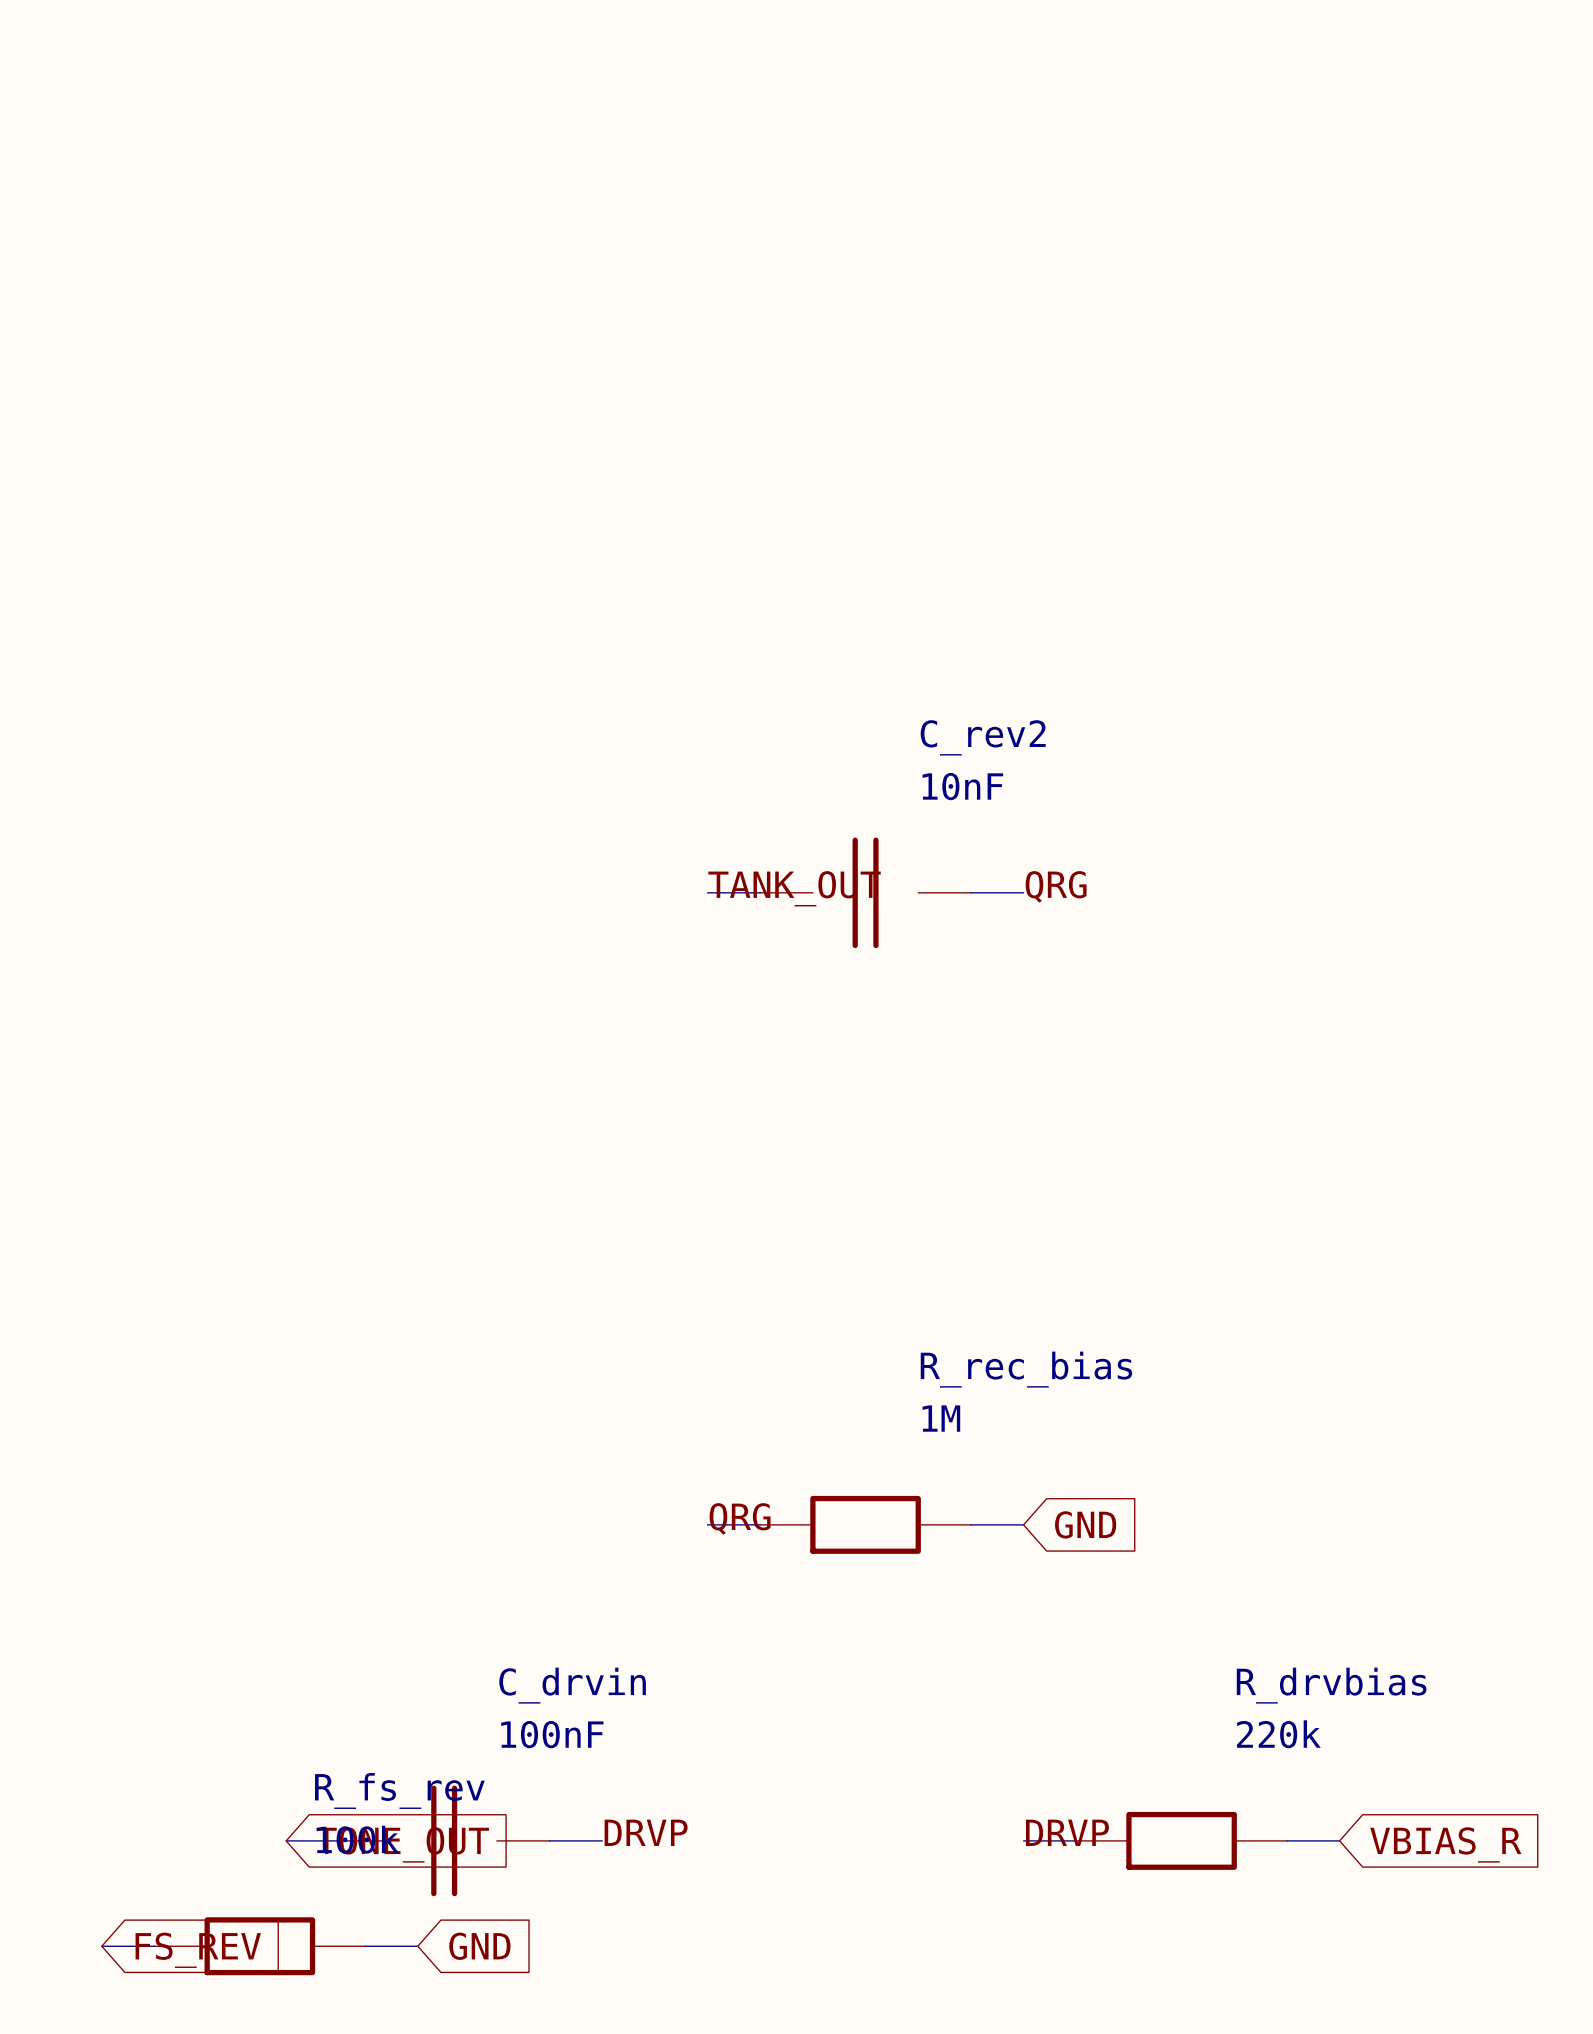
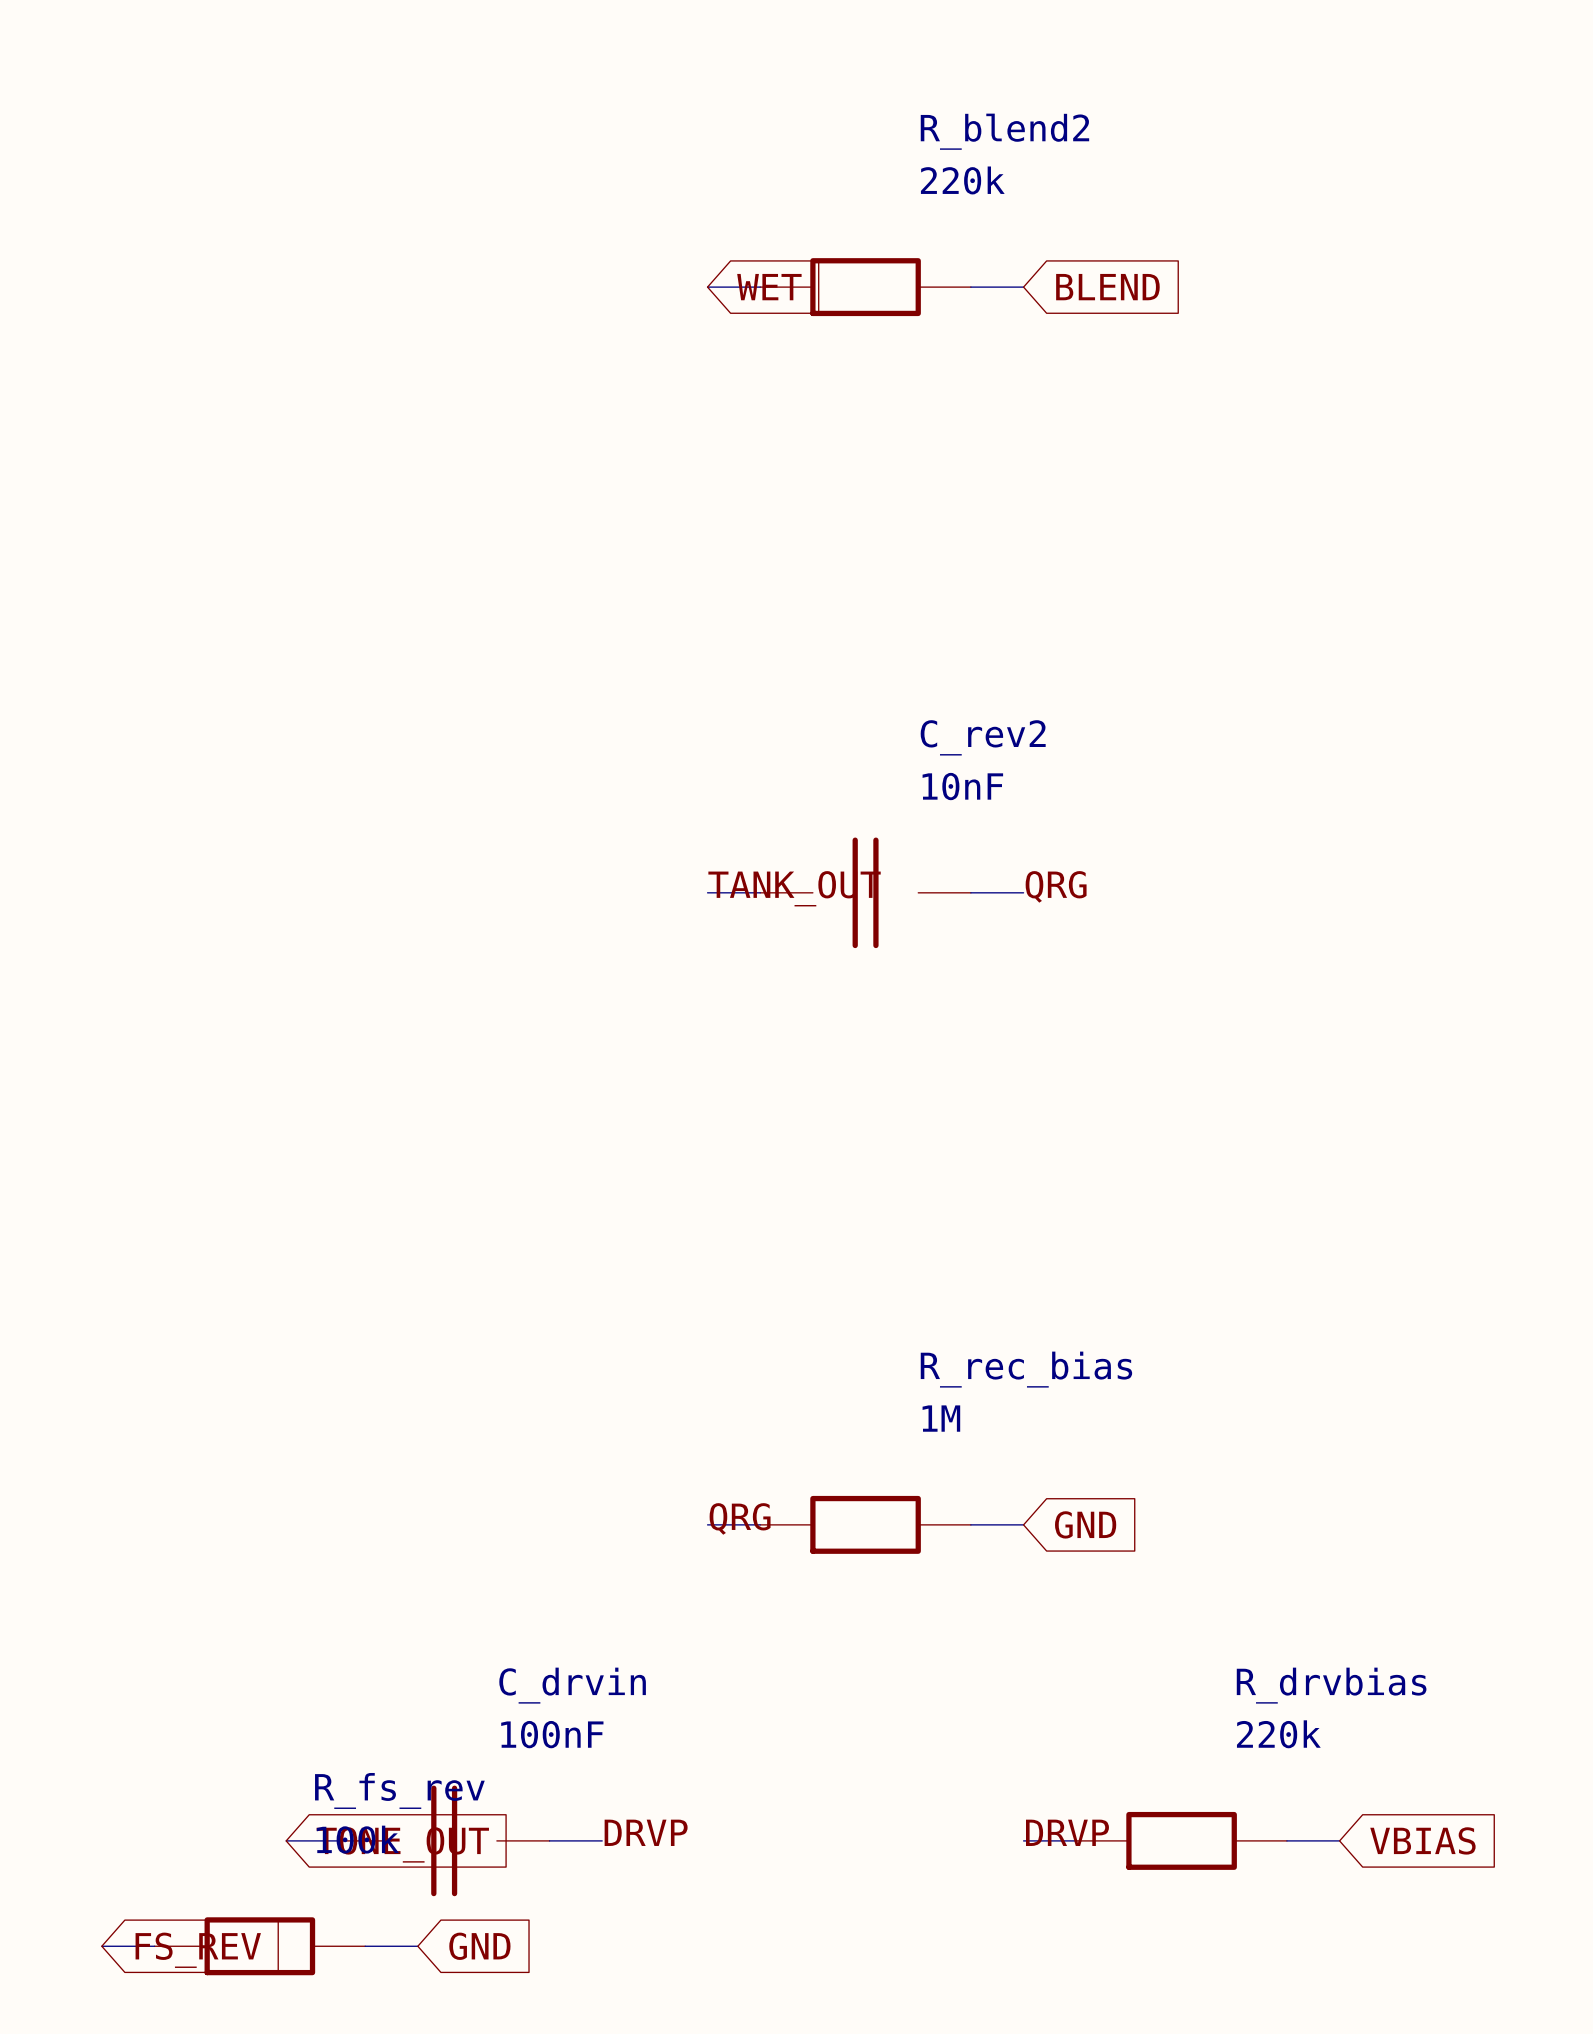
wire: none -> (707, 287) (760, 287)
global label: none -> WET (769, 287)
R_blend2: none -> 220k (865, 287)
wire: none -> (970, 287) (1023, 287)
global label: none -> BLEND (1107, 287)
global label: VBIAS_R (1445, 1844) -> VBIAS (1422, 1840)

